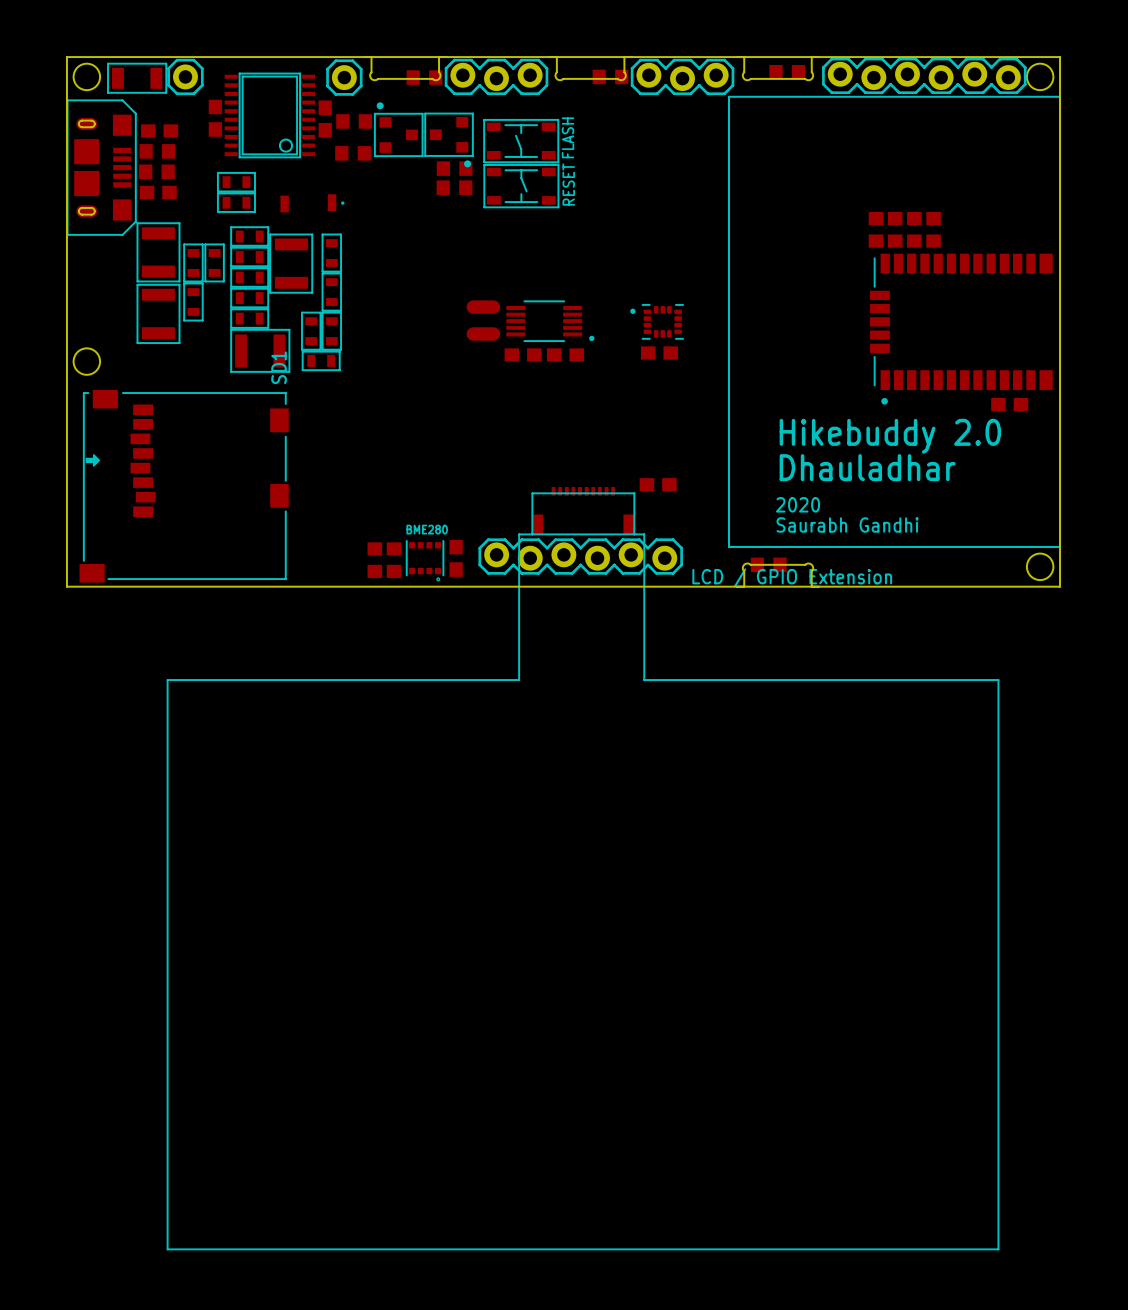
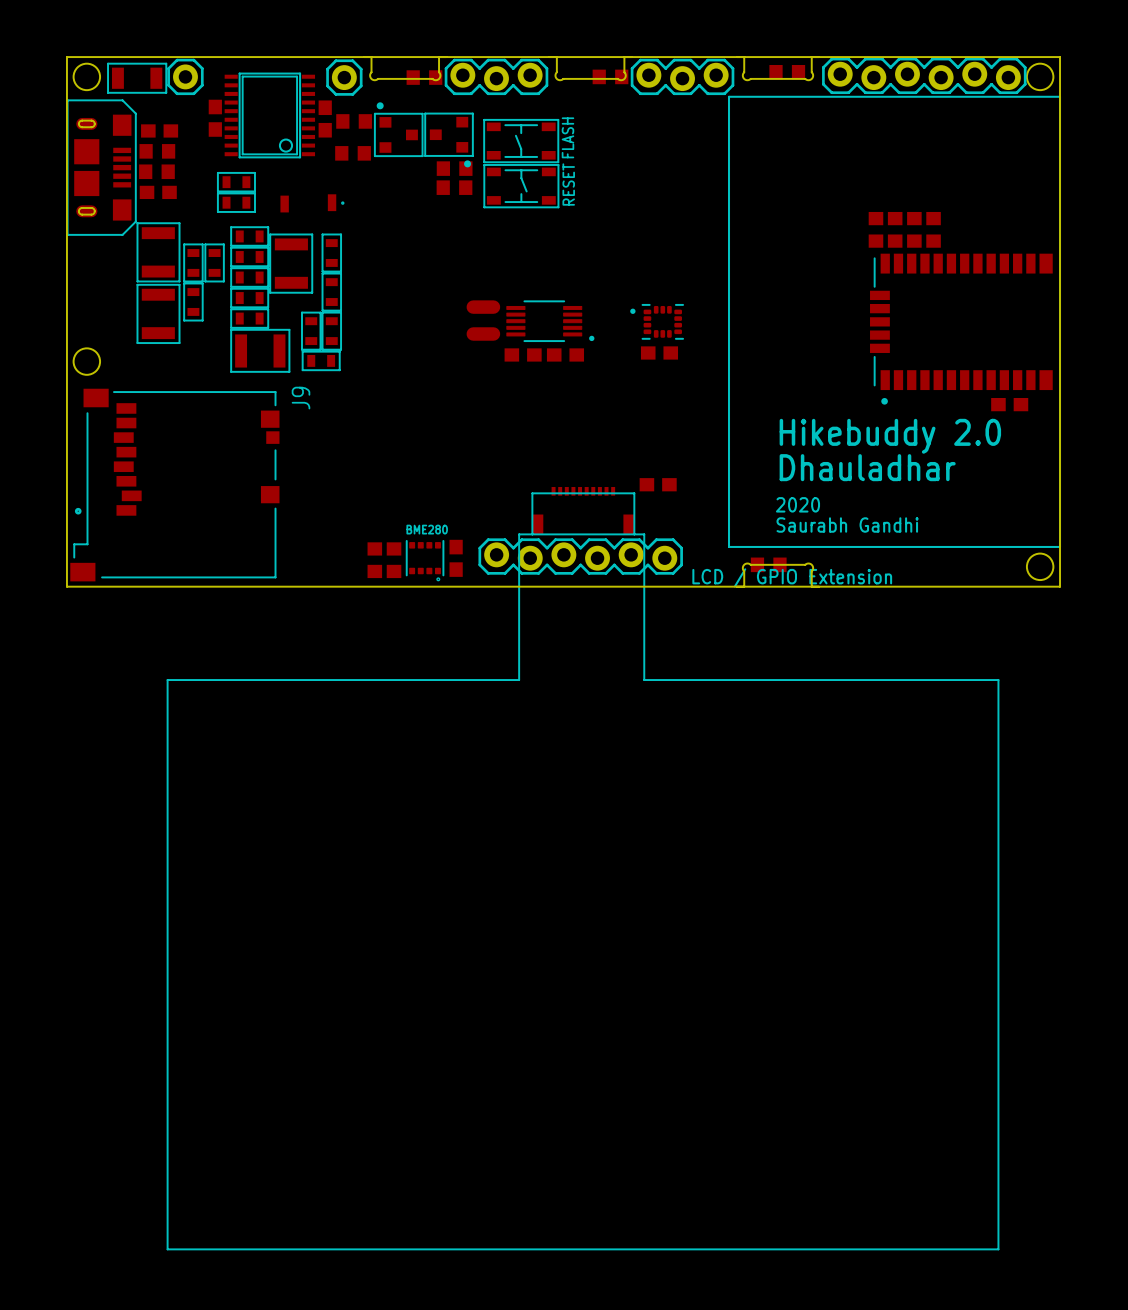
J9: none -> (174, 485)
SD1: (184, 486) -> none

